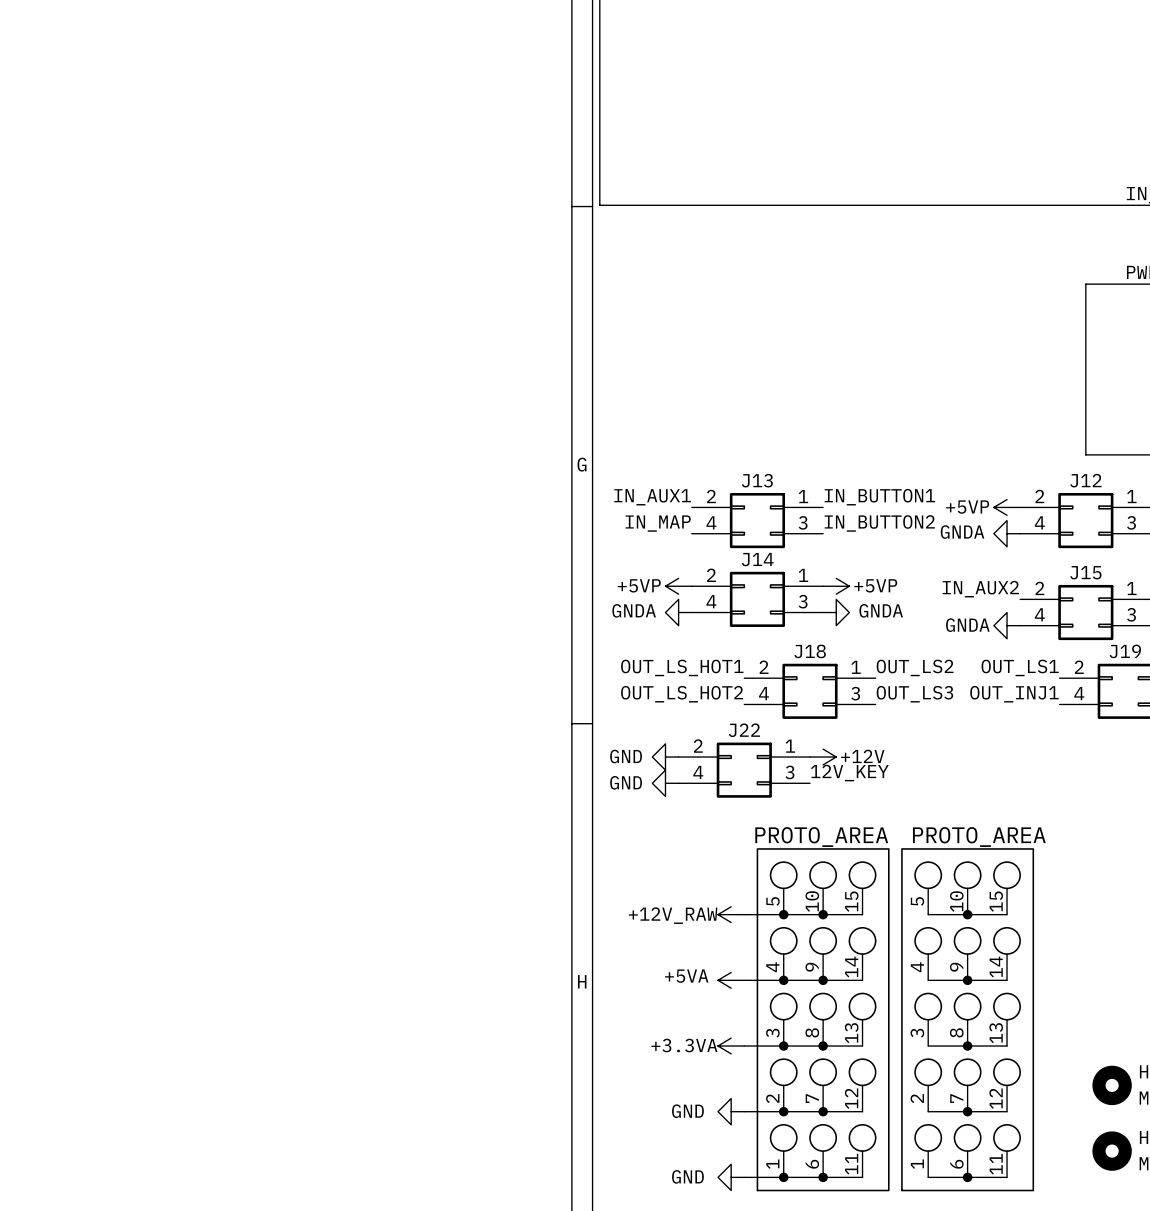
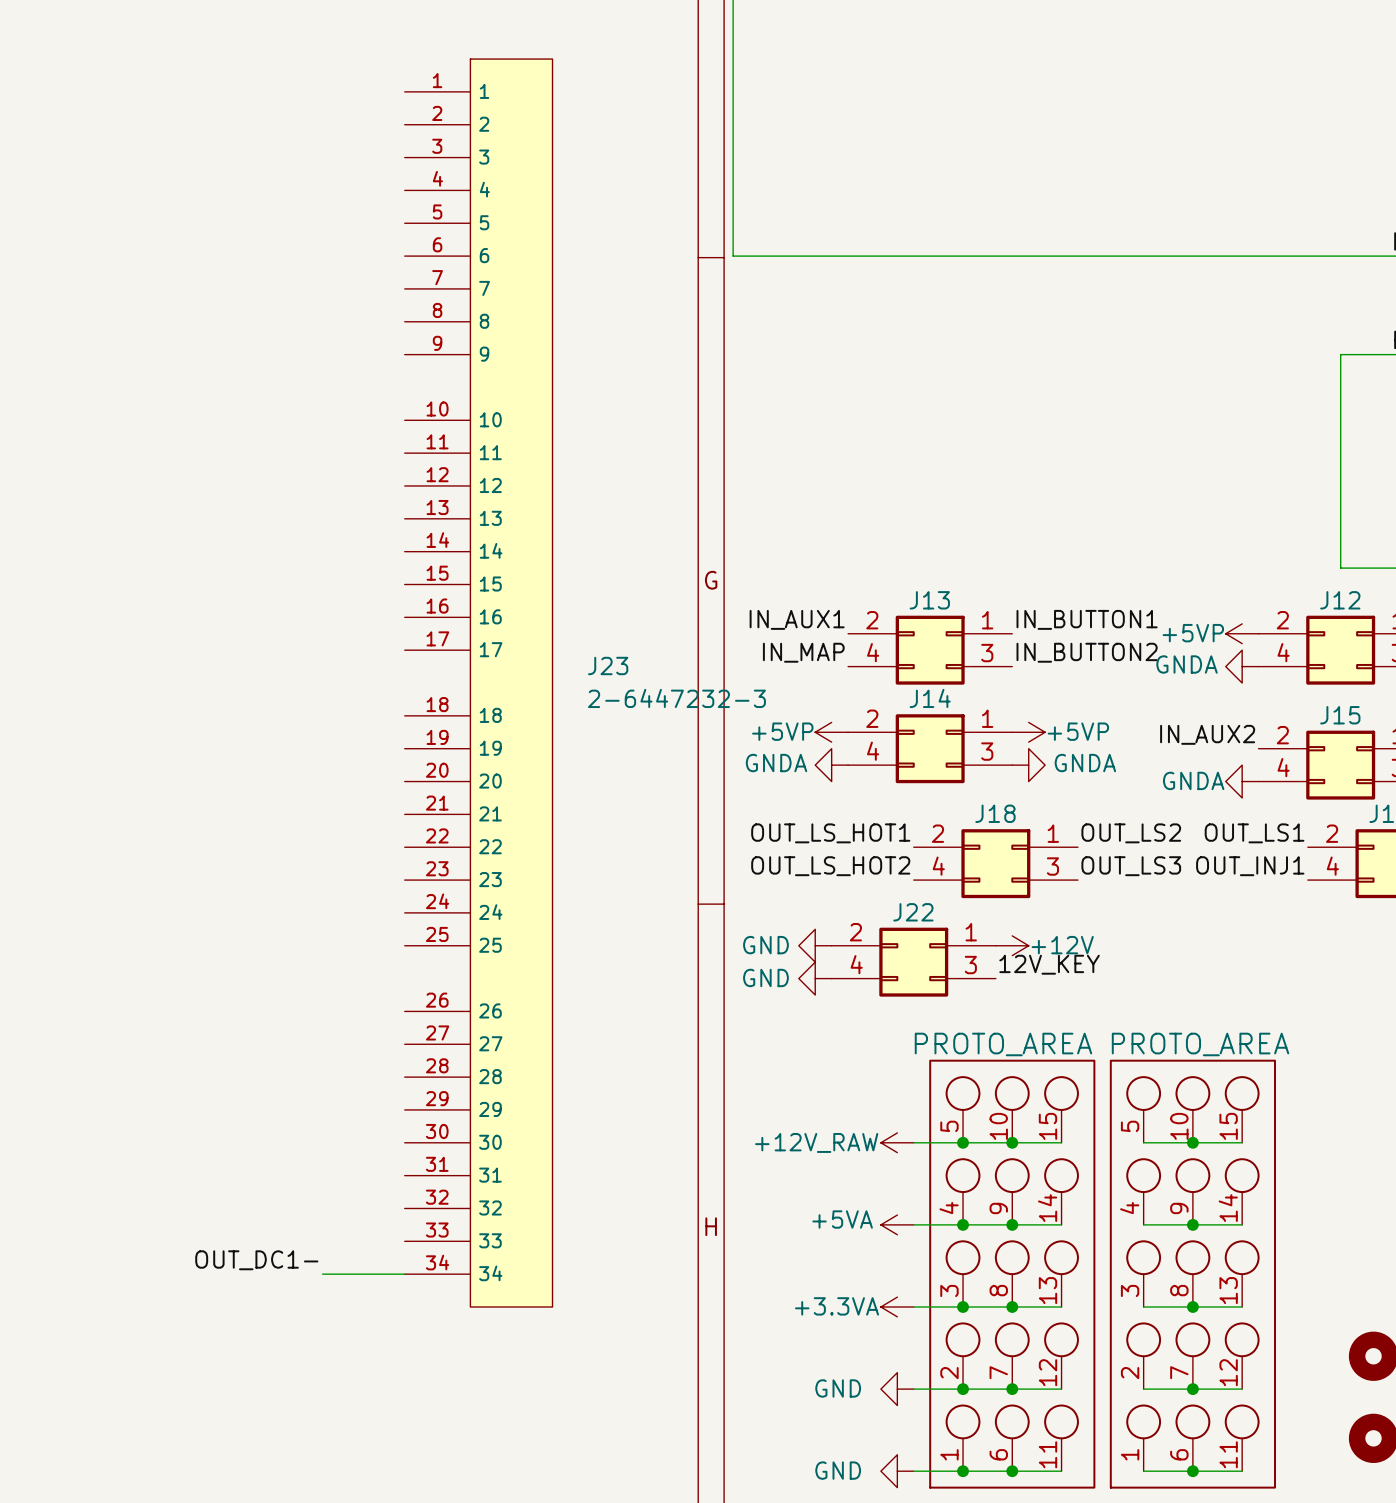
J23: none -> 2-6447232-3 (478, 683)
label: none -> OUT_DC1- (256, 1260)
wire: none -> (322, 1274) (404, 1274)

